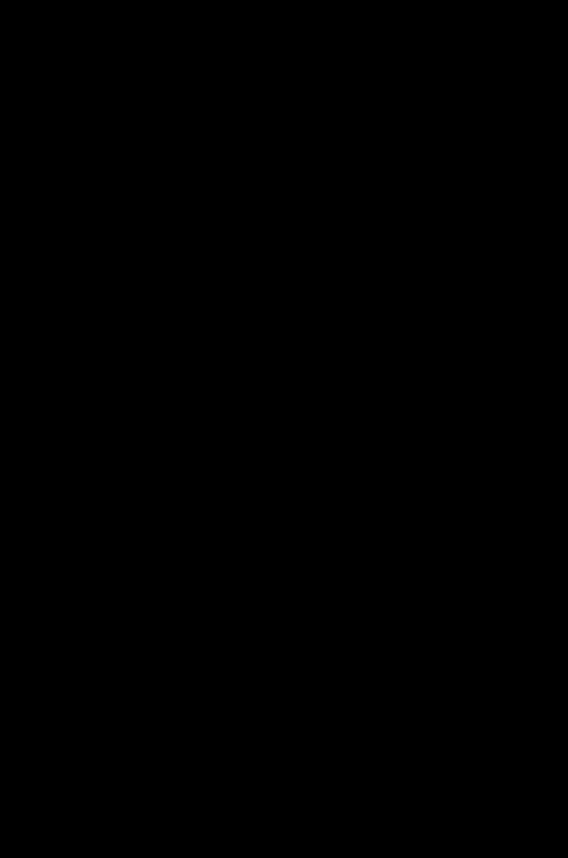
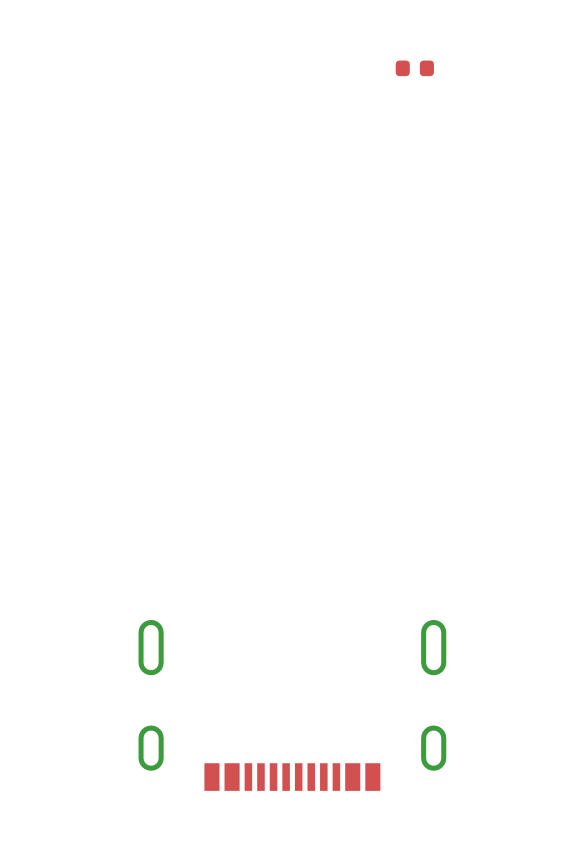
part: none -> (414, 68)
part: none -> (292, 705)

